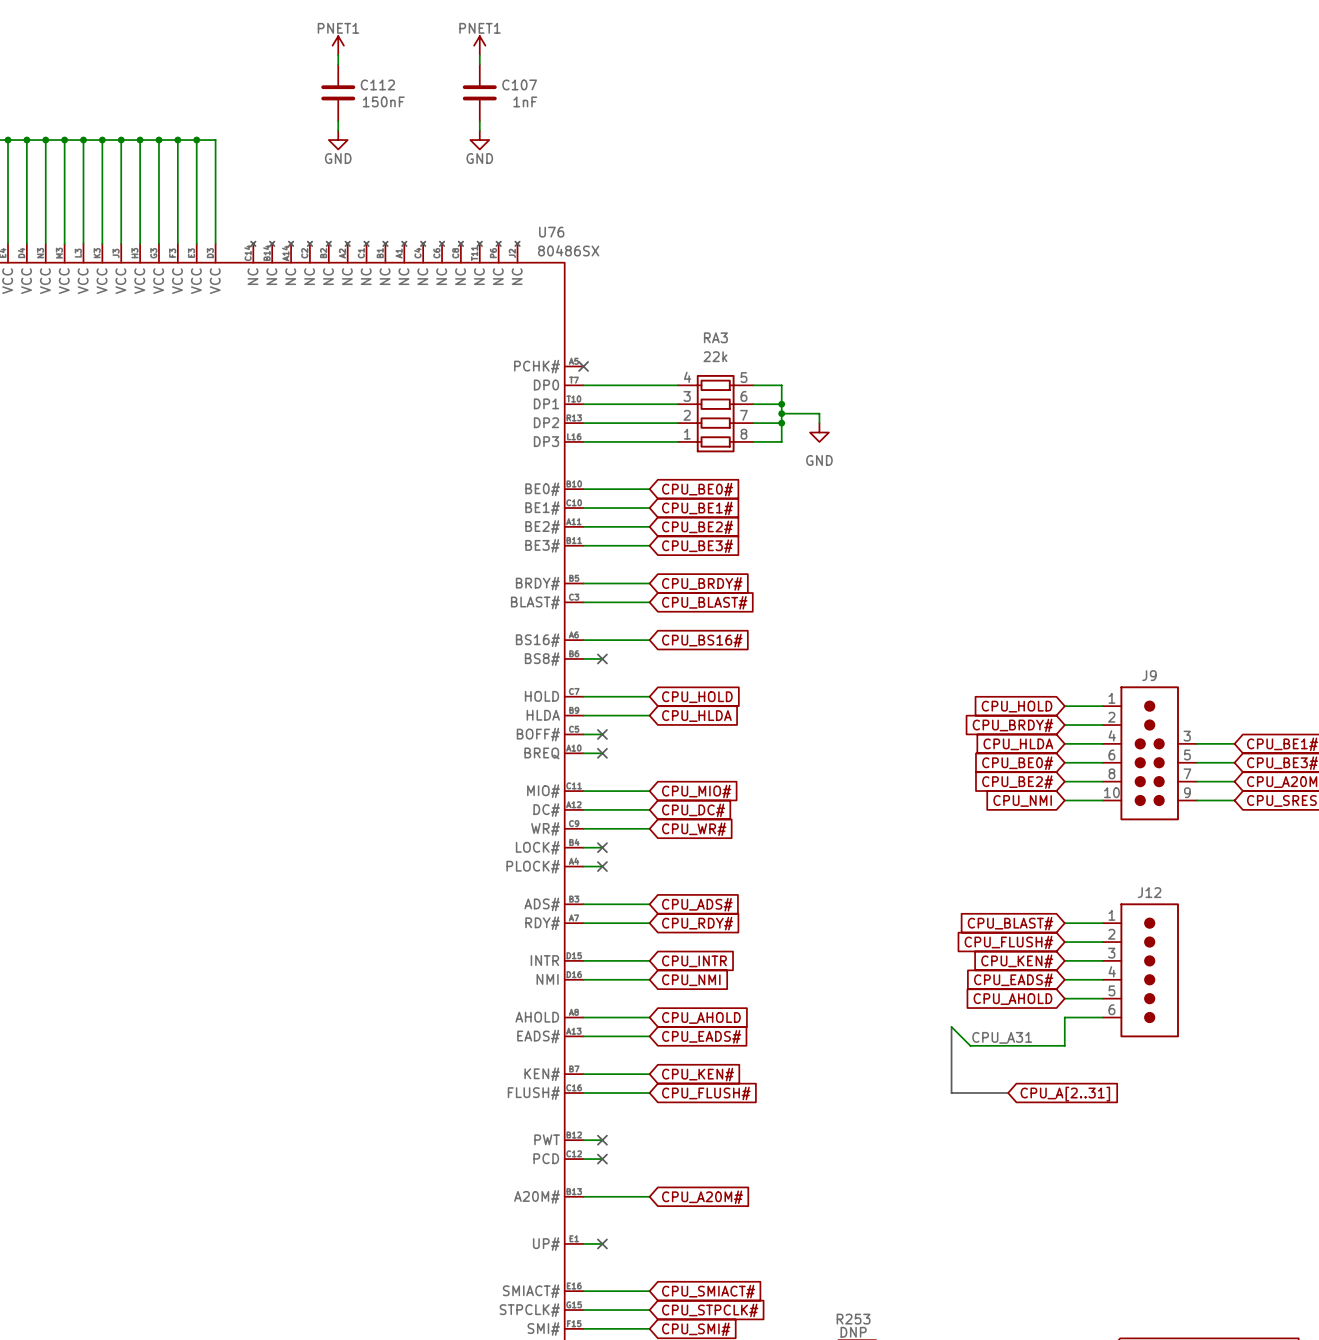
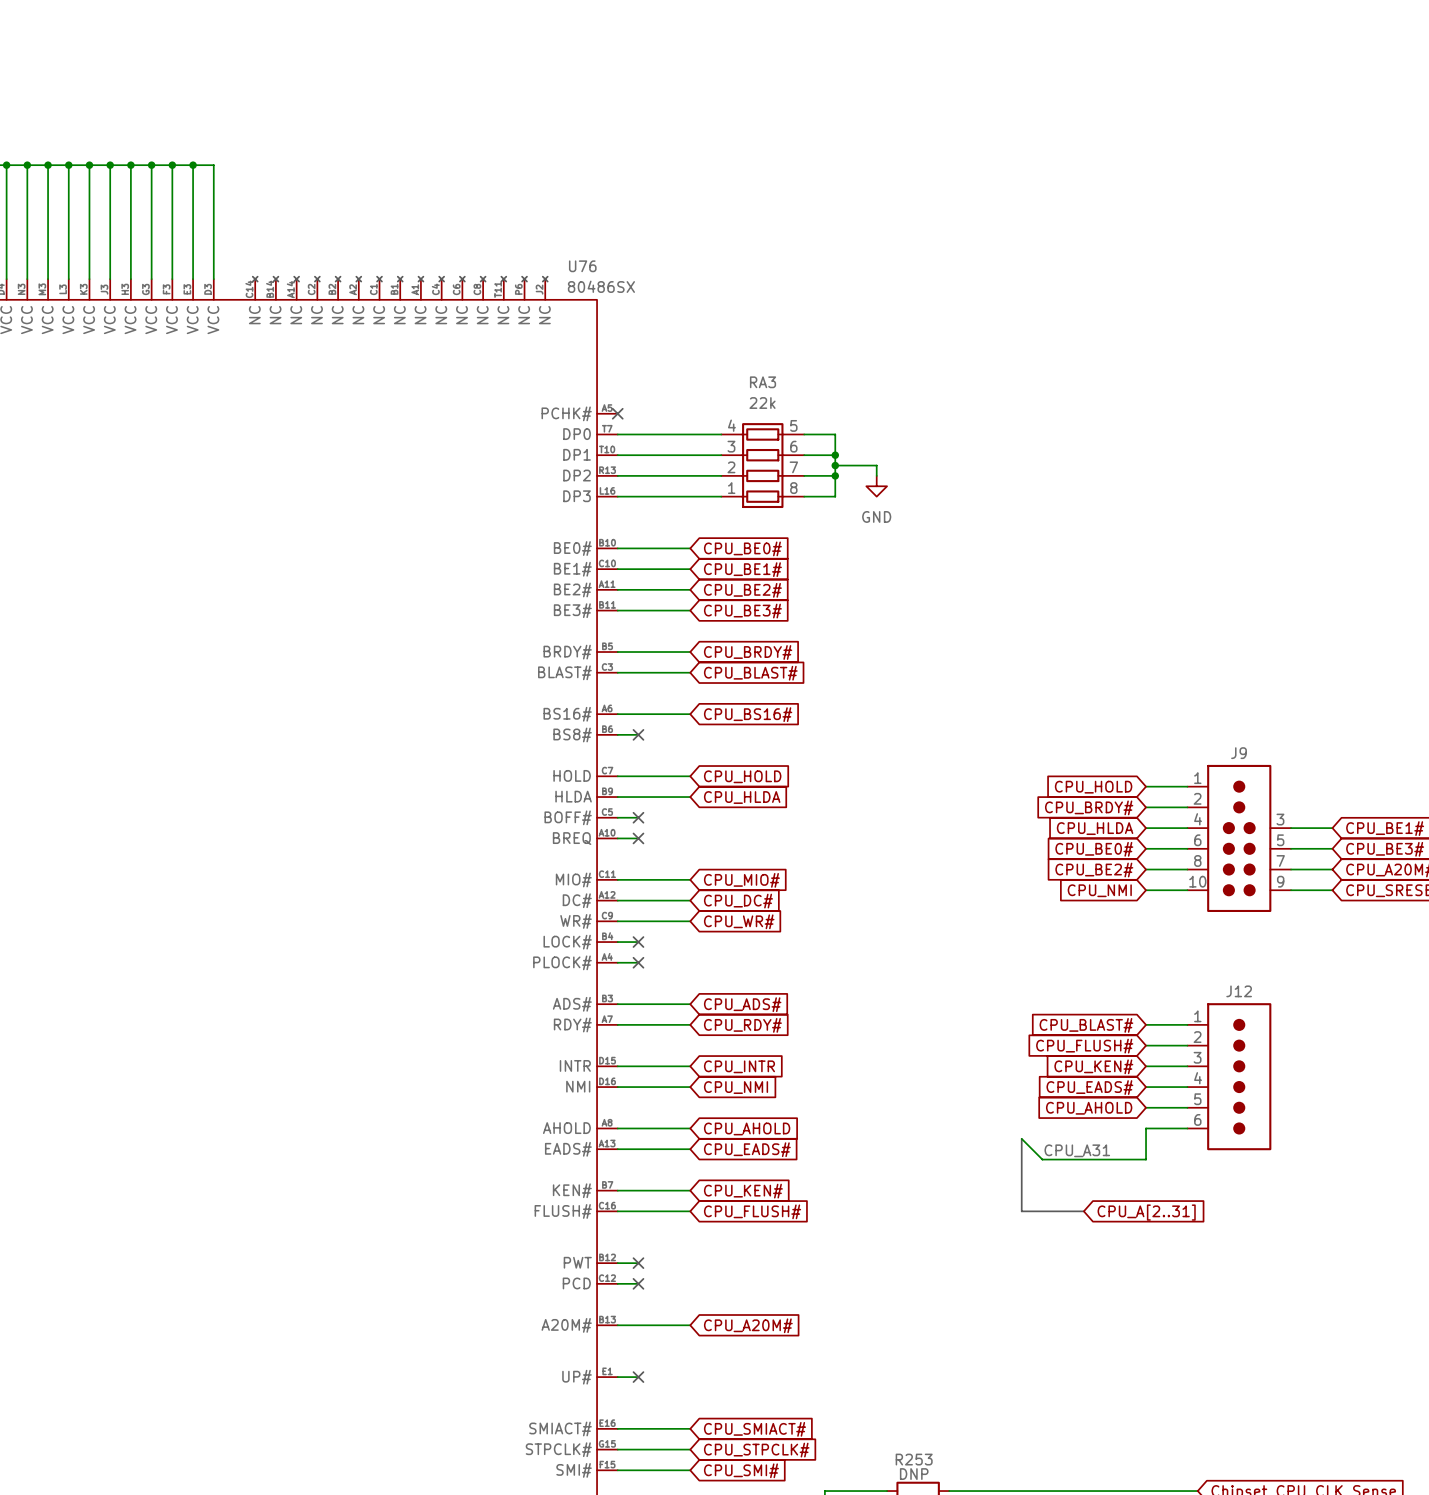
power symbol: PNET1 (338, 45) -> none
power symbol: PNET1 (479, 45) -> none
wire: (338, 55) (338, 64) -> none
wire: (479, 55) (479, 64) -> none
C112: 150nF (338, 92) -> none
C107: 1nF (479, 92) -> none
wire: (338, 121) (338, 130) -> none
wire: (479, 121) (479, 130) -> none
power symbol: GND (338, 140) -> none
power symbol: GND (479, 140) -> none

